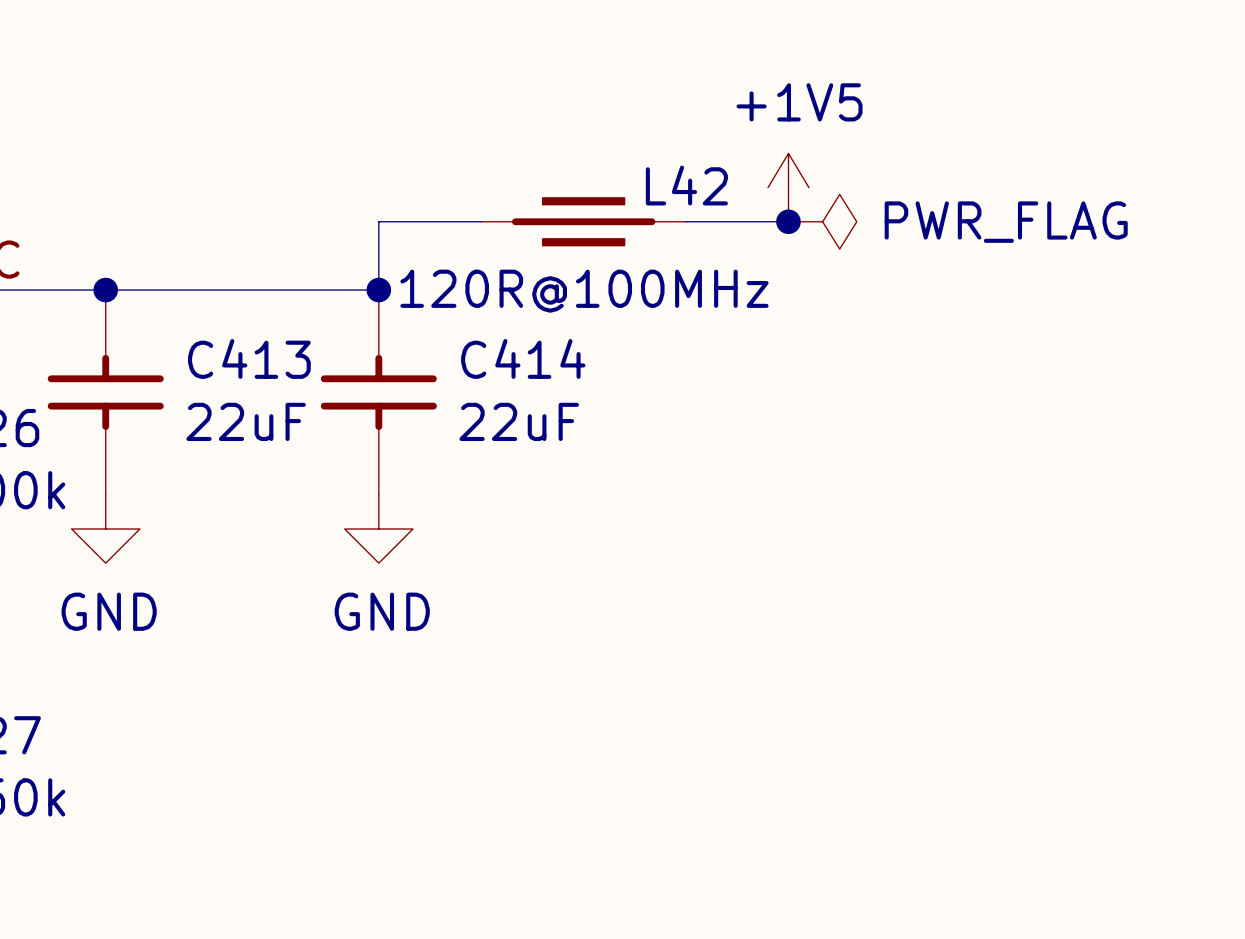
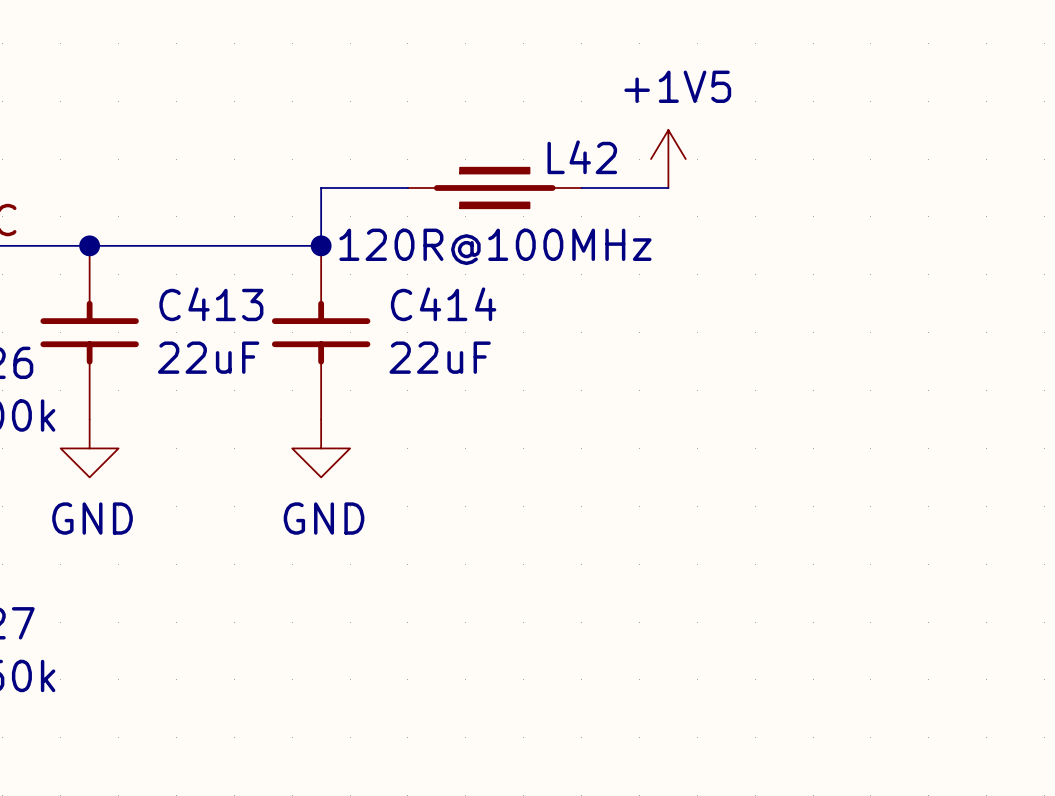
junction: (788, 221) -> none
power symbol: PWR_FLAG (822, 221) -> none

